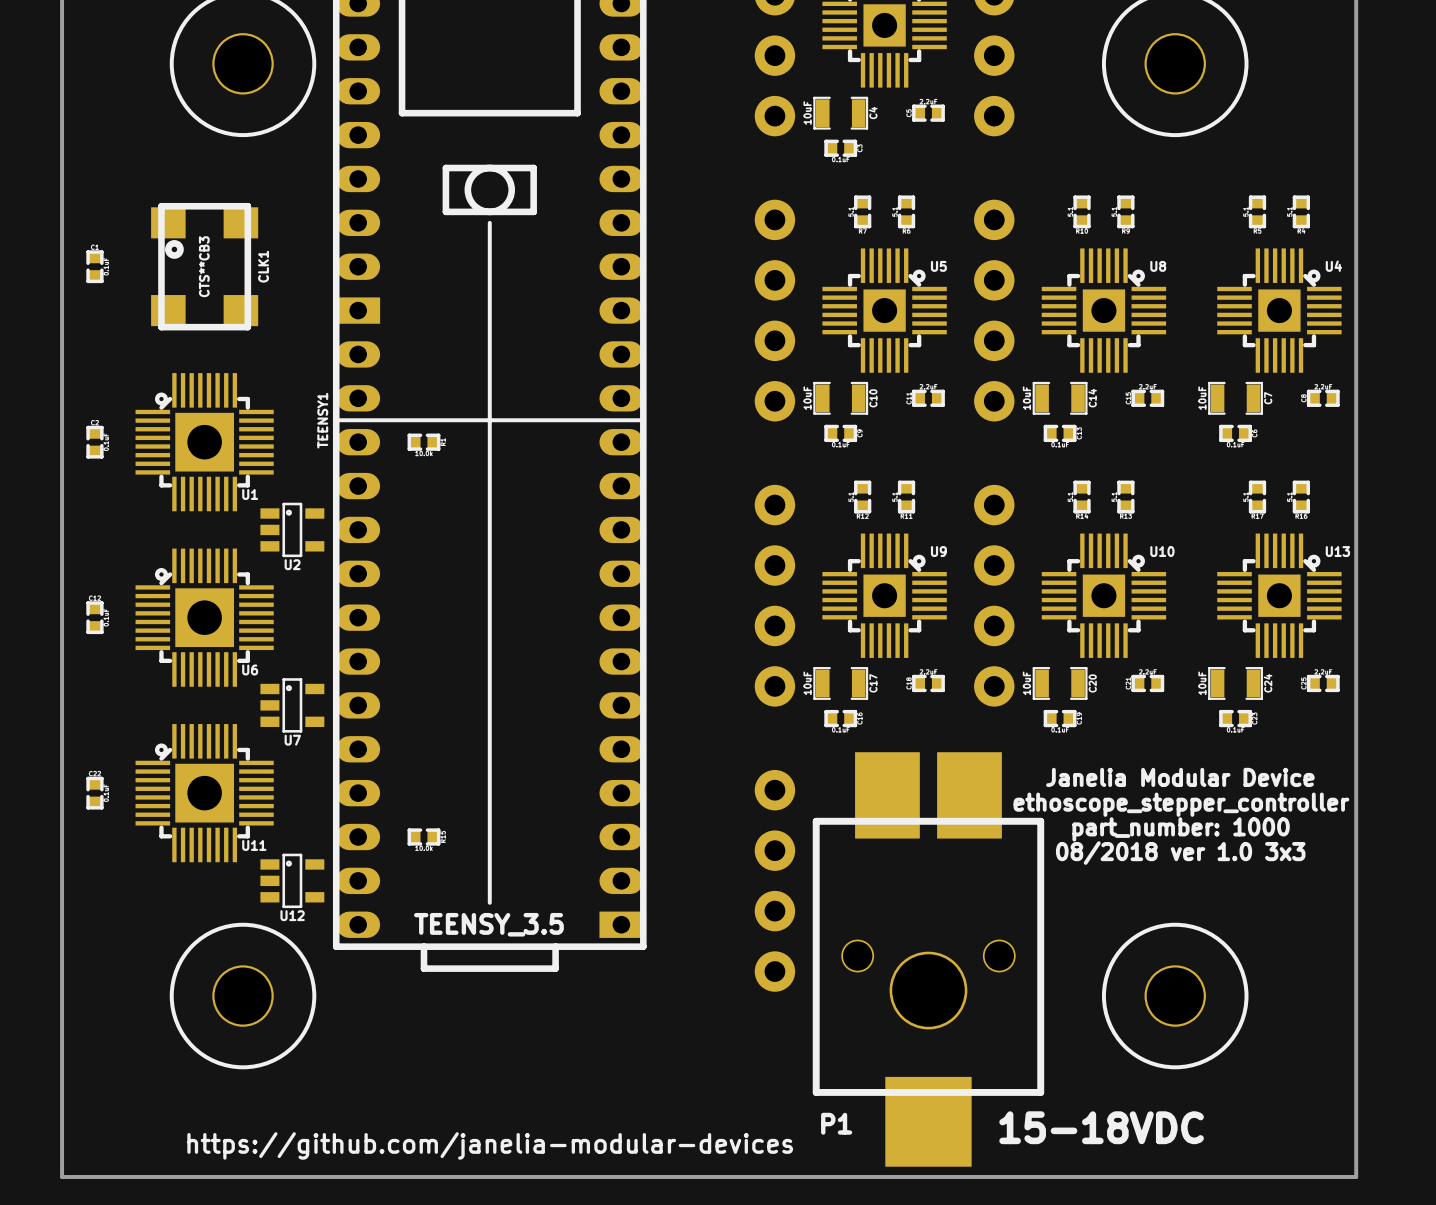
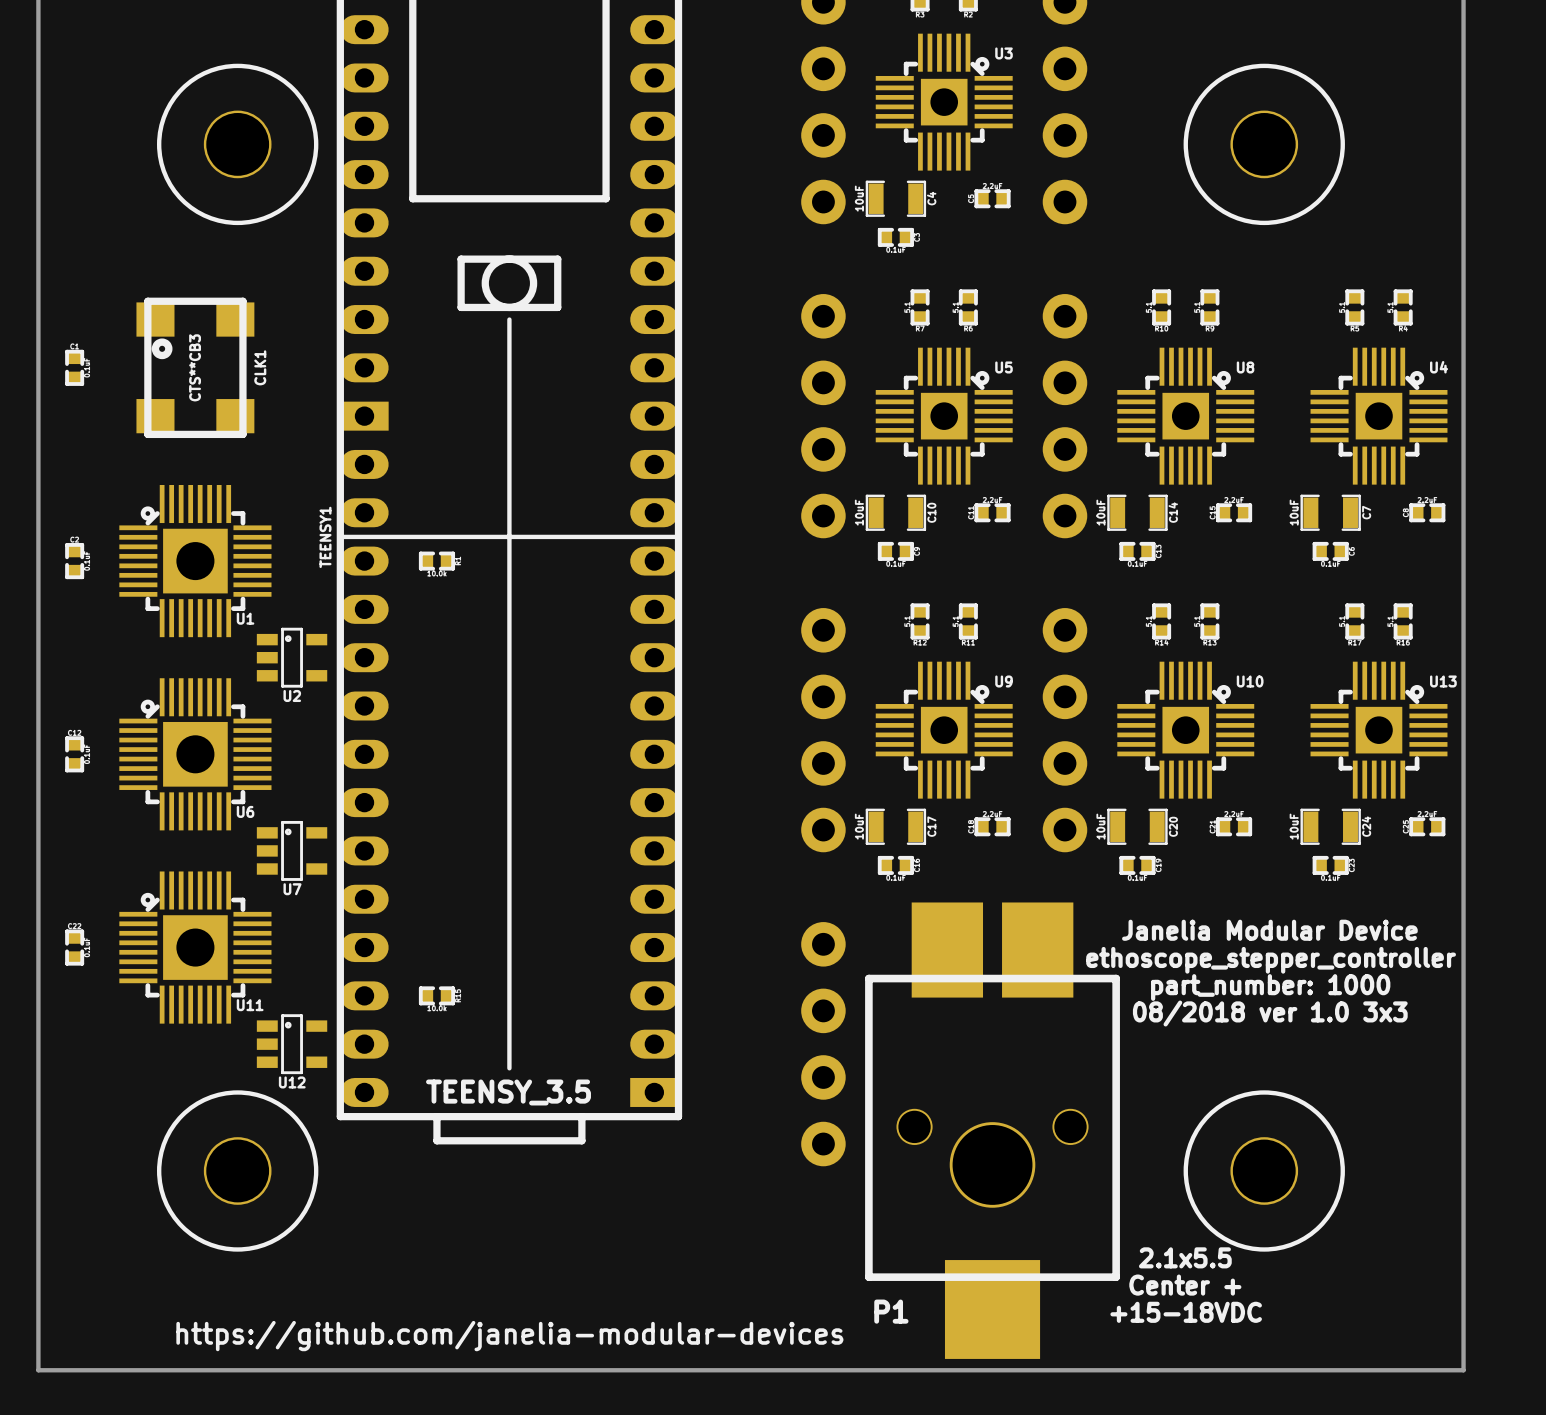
text: none -> 2.1x5.5 (1185, 1257)
text: none -> Center + (1185, 1285)
text: none -> +15-18VDC (1186, 1312)
P1 text: 15-18VDC (1101, 1127) -> none

